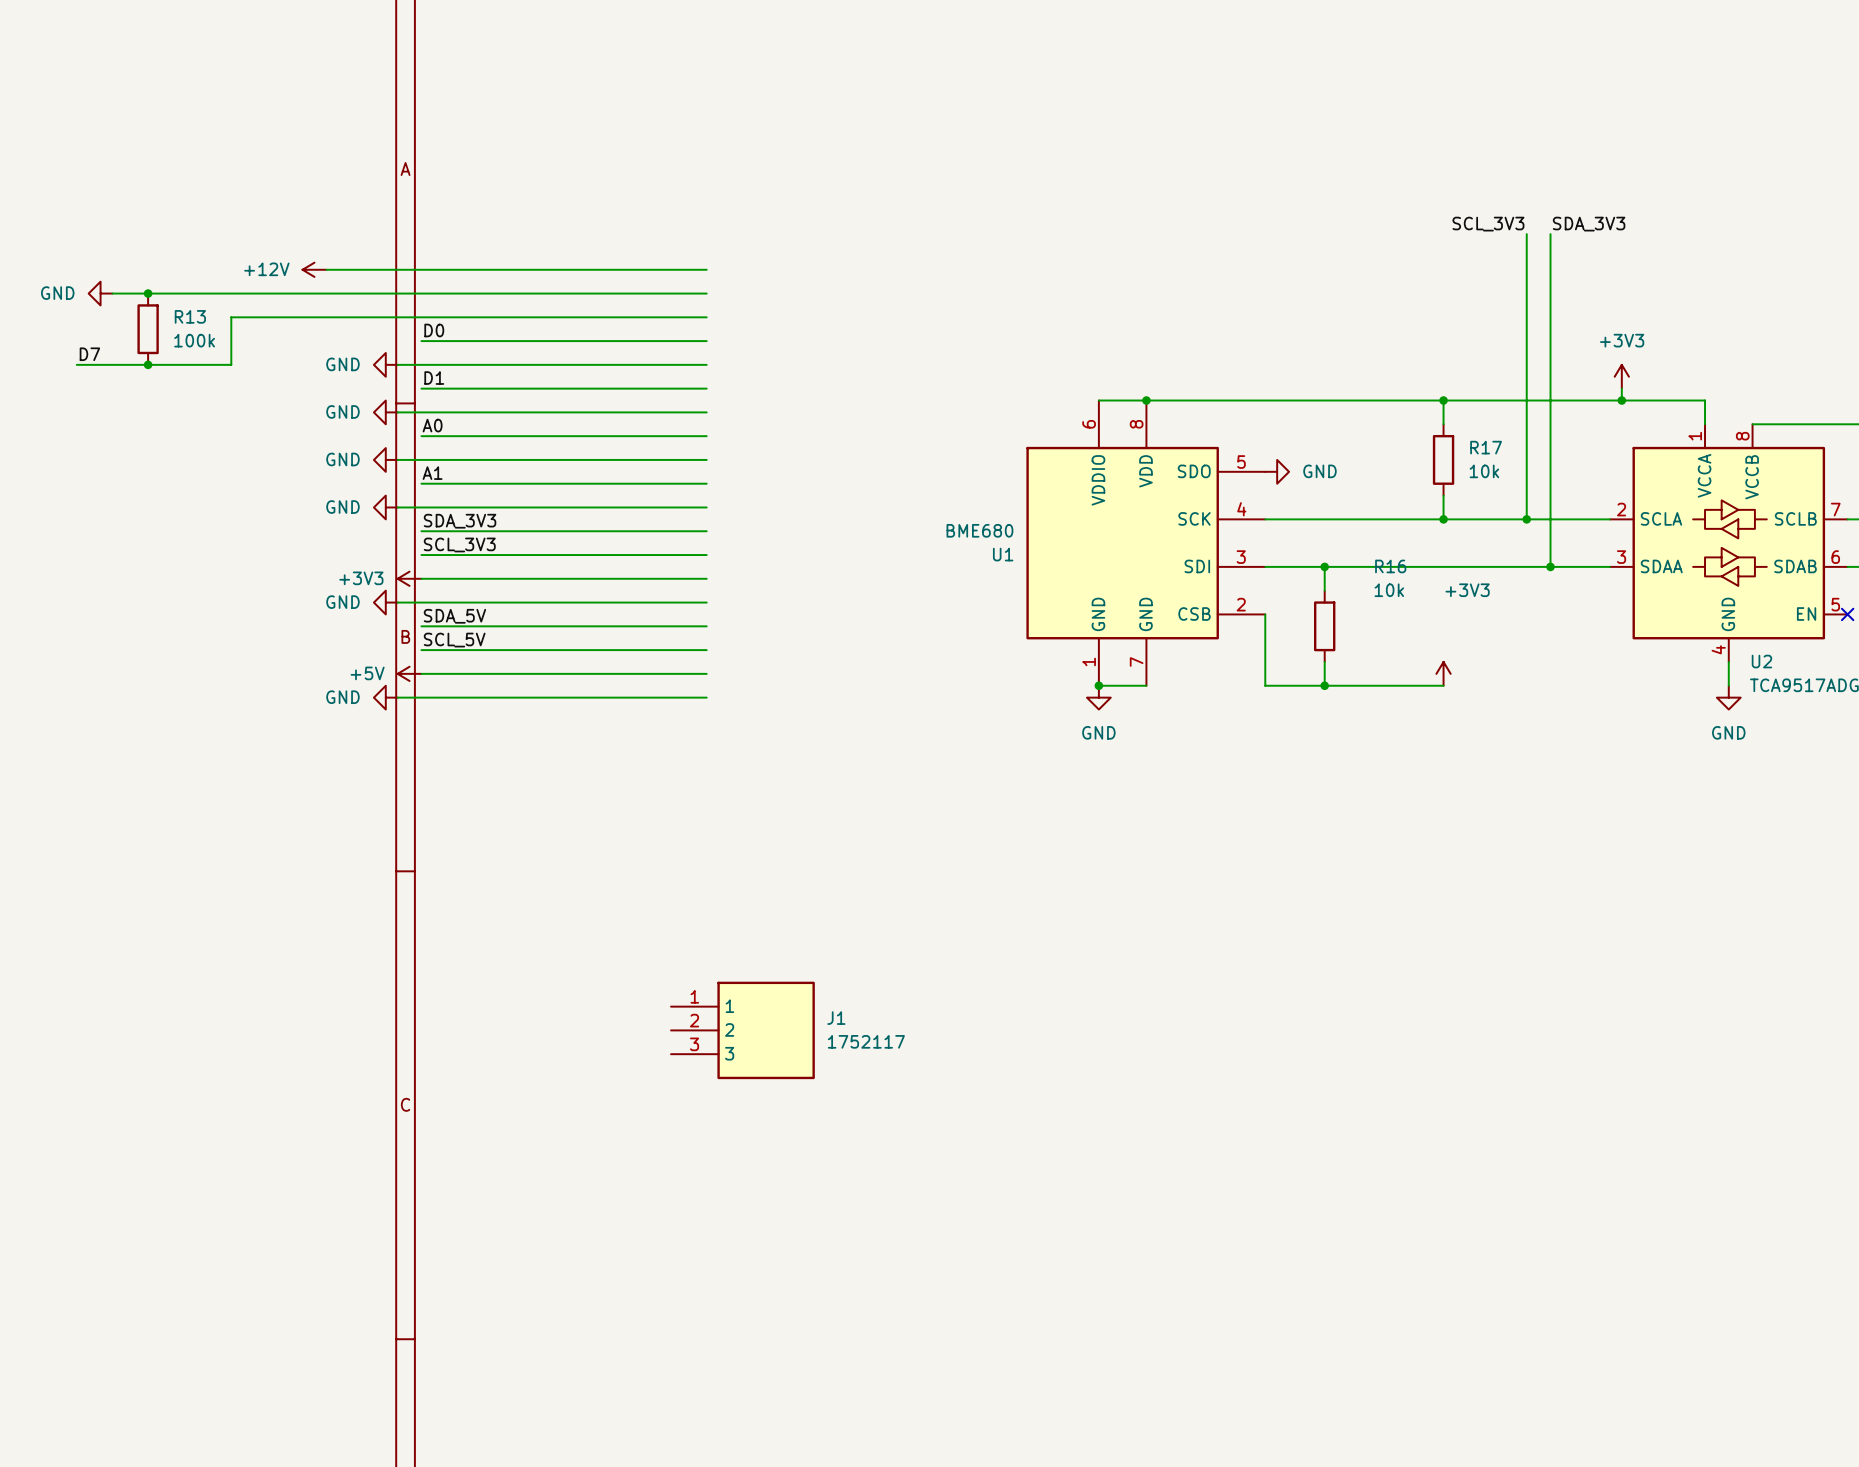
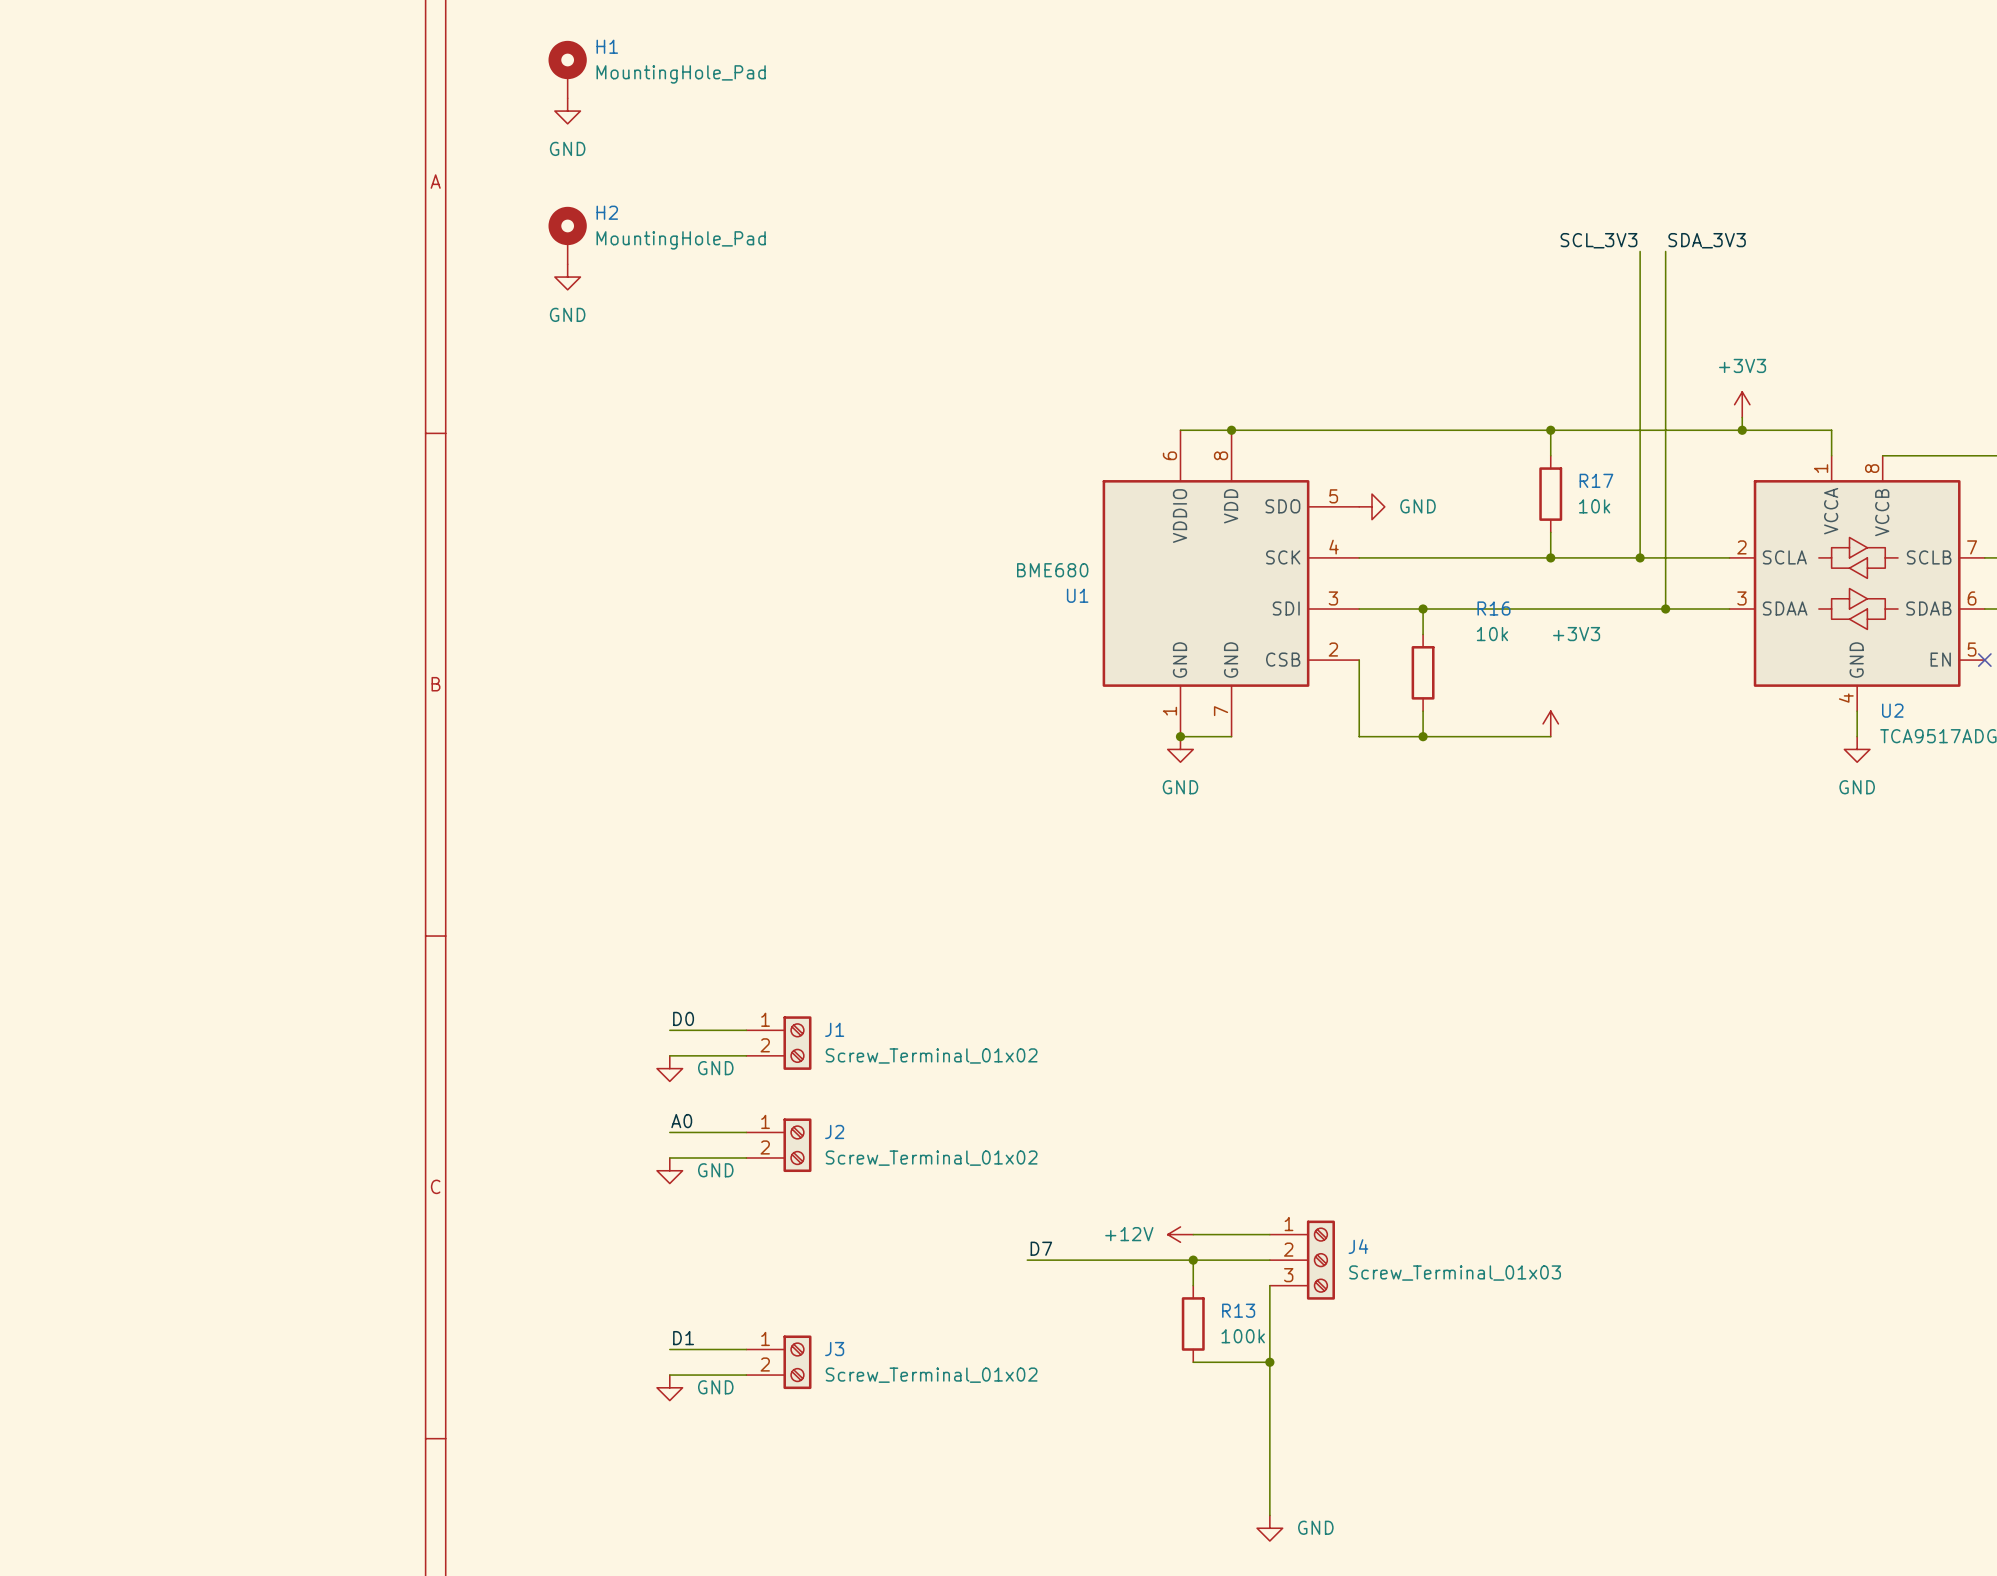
H1: none -> MountingHole_Pad (567, 69)
power symbol: none -> GND (567, 111)
H2: none -> MountingHole_Pad (567, 235)
power symbol: none -> GND (567, 277)
power symbol: +12V (314, 269) -> none
wire: (326, 269) (706, 269) -> none
power symbol: GND (100, 293) -> none
wire: (112, 293) (706, 293) -> none
junction: (148, 293) -> none
wire: (706, 317) (231, 317) (231, 364) (76, 364) -> none
R13 position: (148, 329) -> (1193, 1323)
label: D0 (434, 330) -> none
wire: (421, 341) (706, 341) -> none
label: D7 (89, 354) -> none
junction: (148, 364) -> none
power symbol: GND (385, 364) -> none
wire: (397, 364) (706, 364) -> none
label: D1 (434, 378) -> none
wire: (421, 388) (706, 388) -> none
power symbol: GND (385, 412) -> none
wire: (397, 412) (706, 412) -> none
label: A0 (432, 425) -> none
wire: (421, 436) (706, 436) -> none
power symbol: GND (385, 459) -> none
wire: (397, 459) (706, 459) -> none
label: A1 (432, 473) -> none
wire: (421, 483) (706, 483) -> none
power symbol: GND (385, 507) -> none
wire: (397, 507) (706, 507) -> none
label: SDA_3V3 (460, 521) -> none
wire: (421, 531) (706, 531) -> none
label: SCL_3V3 (459, 544) -> none
wire: (421, 555) (706, 555) -> none
power symbol: +3V3 (409, 578) -> none
wire: (421, 578) (706, 578) -> none
power symbol: GND (385, 602) -> none
wire: (397, 602) (706, 602) -> none
label: SDA_5V (454, 616) -> none
wire: (421, 626) (706, 626) -> none
label: SCL_5V (454, 640) -> none
wire: (421, 650) (706, 650) -> none
power symbol: +5V (409, 673) -> none
wire: (421, 673) (706, 673) -> none
power symbol: GND (385, 697) -> none
wire: (397, 697) (706, 697) -> none
label: none -> D0 (683, 1018)
wire: none -> (669, 1030) (746, 1030)
J1 symbol: [671, 981, 815, 1080] -> [746, 1016, 812, 1070]
wire: none -> (669, 1055) (746, 1055)
power symbol: none -> GND (669, 1068)
J1 name position: J1 (836, 1018) -> J1 (834, 1029)
J1 value: 1752117 (866, 1041) -> Screw_Terminal_01x02 (931, 1055)
label: none -> A0 (681, 1121)
wire: none -> (669, 1132) (746, 1132)
J2: none -> Screw_Terminal_01x02 (778, 1145)
wire: none -> (669, 1157) (746, 1157)
power symbol: none -> GND (669, 1170)
power symbol: none -> +12V (1180, 1234)
wire: none -> (1193, 1234) (1269, 1234)
label: none -> D7 (1041, 1248)
wire: none -> (1027, 1260) (1269, 1260)
wire: none -> (1193, 1260) (1193, 1285)
junction: none -> (1193, 1260)
J4: none -> Screw_Terminal_01x03 (1302, 1260)
wire: none -> (1269, 1285) (1269, 1515)
label: none -> D1 (683, 1338)
wire: none -> (669, 1349) (746, 1349)
J3: none -> Screw_Terminal_01x02 (778, 1362)
wire: none -> (1193, 1362) (1269, 1362)
junction: none -> (1269, 1362)
wire: none -> (669, 1375) (746, 1375)
power symbol: none -> GND (669, 1387)
power symbol: none -> GND (1269, 1528)

